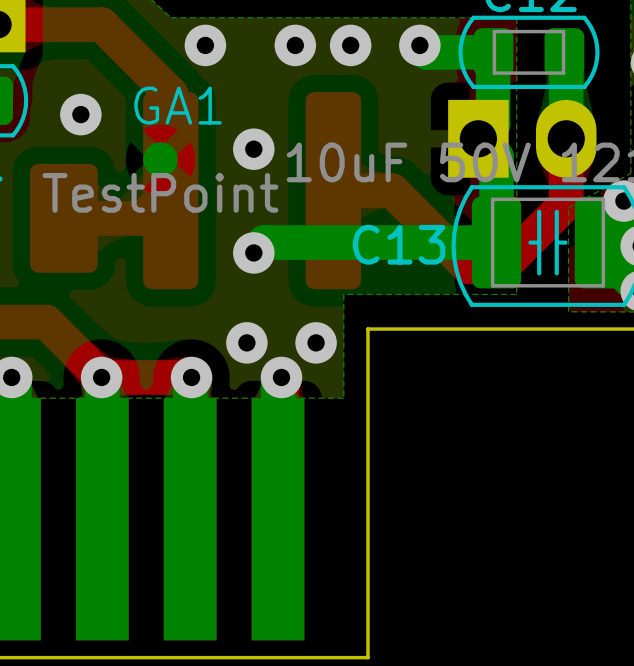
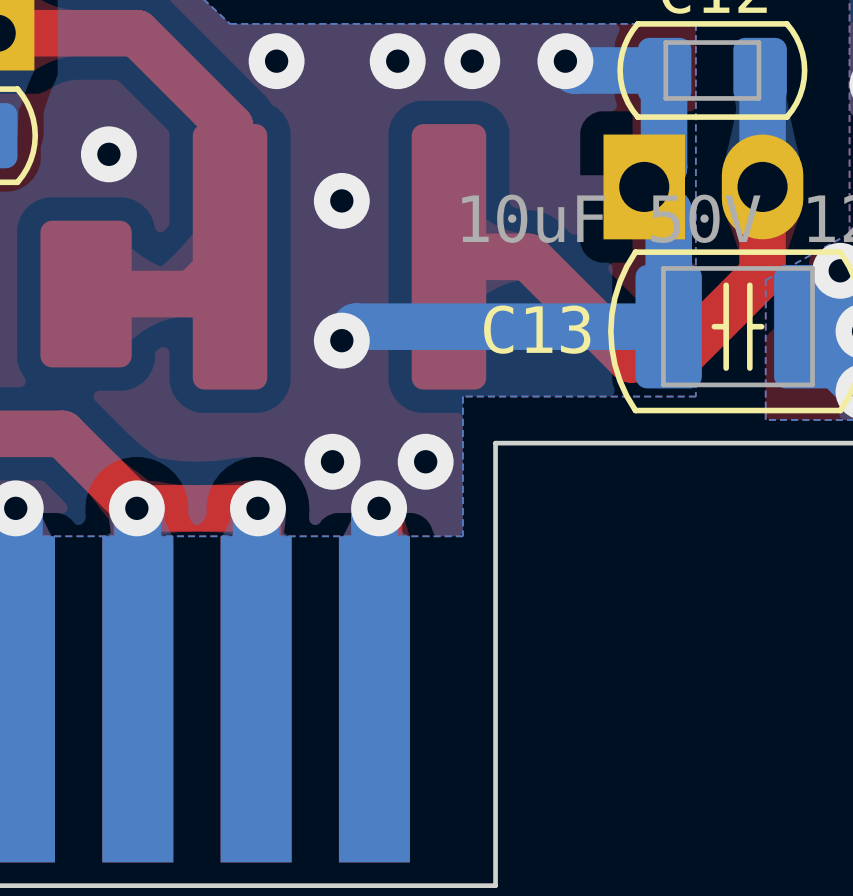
GA1: TestPoint (160, 159) -> none

